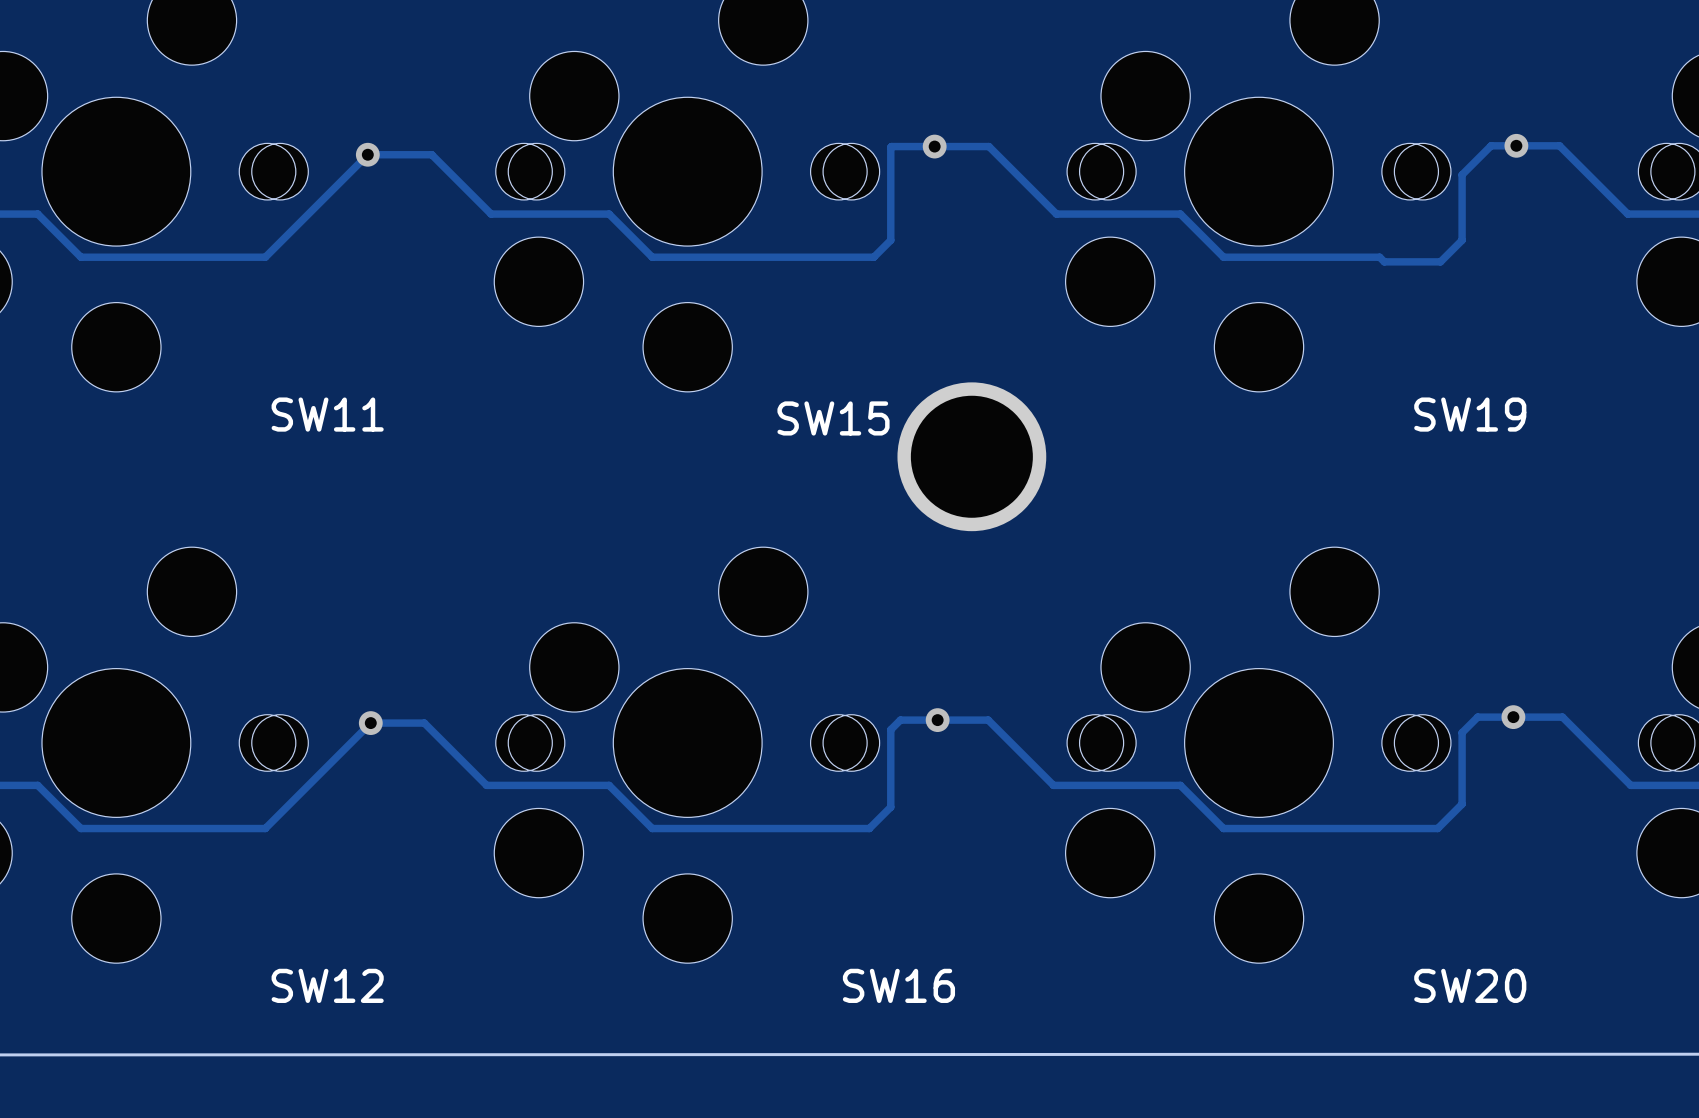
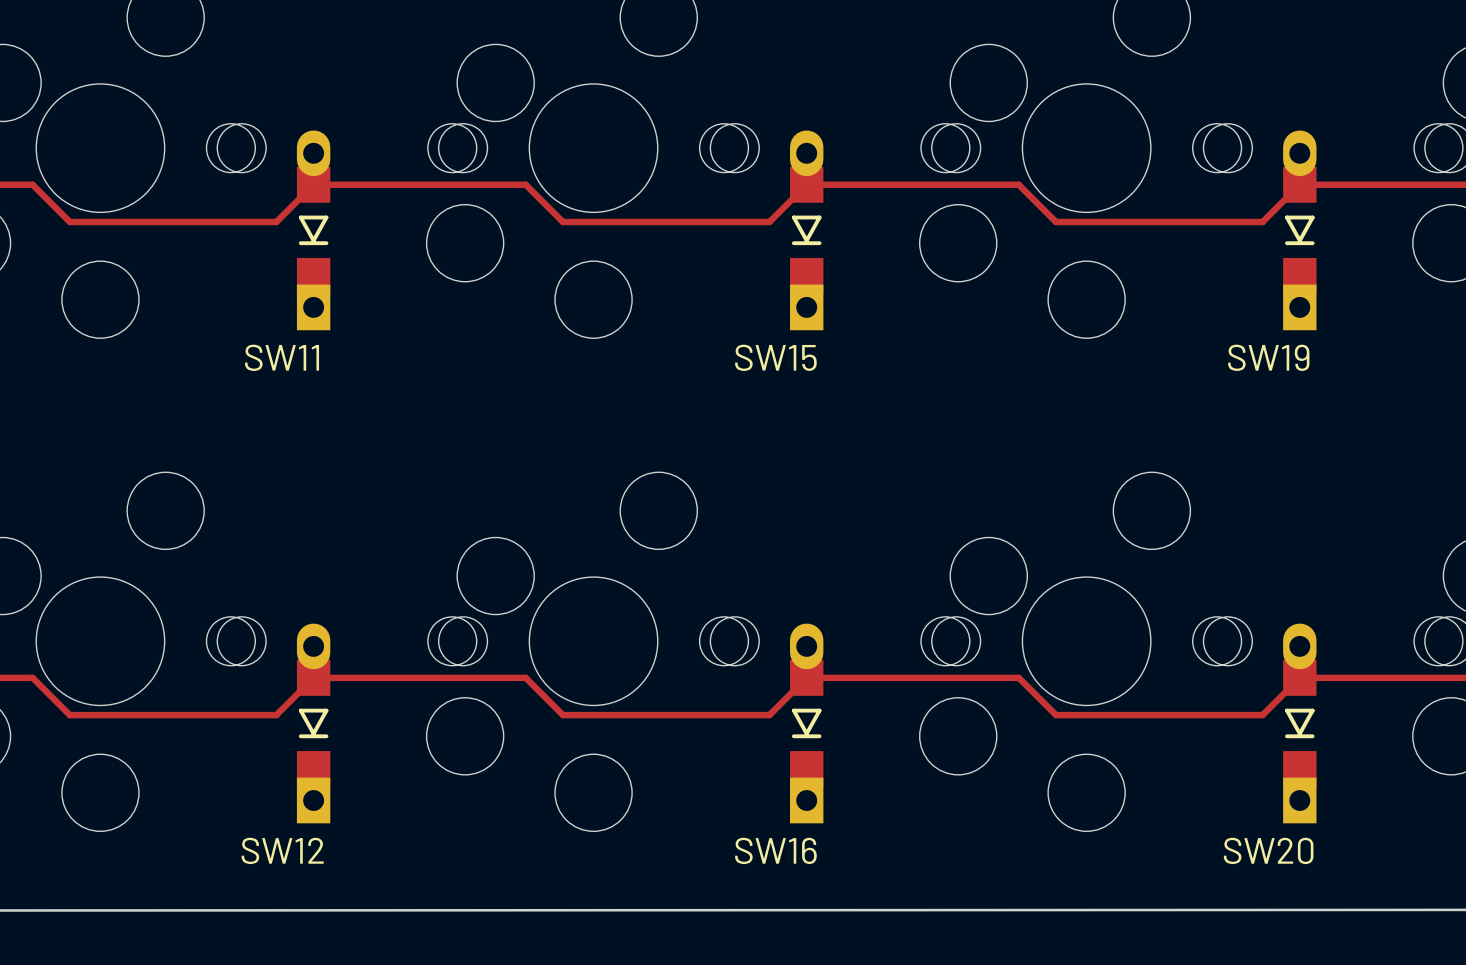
via: (1516, 145) -> none
via: (934, 146) -> none
via: (367, 154) -> none
track: (491, 214) (431, 154) (367, 154) (265, 257) -> (423, 184) (313, 184) (276, 222) (229, 222)
track: (1056, 214) (988, 146) (891, 146) (890, 240) (873, 257) -> (911, 184) (806, 184) (769, 222) (754, 222)
track: (1627, 214) (1559, 145) (1491, 145) (1462, 174) (1462, 240) (1440, 261) (1384, 261) (1379, 257) -> (1404, 184) (1299, 184) (1262, 222) (1190, 222)
part: none -> (313, 230)
part: none -> (806, 230)
part: none -> (1299, 230)
SW15 name position: SW15 (833, 418) -> SW15 (775, 357)
part: (971, 456) -> none
via: (1513, 717) -> none
via: (937, 720) -> none
via: (370, 723) -> none
track: (486, 785) (424, 723) (370, 723) (265, 828) -> (420, 677) (313, 677) (276, 715) (229, 715)
track: (1053, 785) (988, 720) (900, 720) (890, 729) (890, 807) (869, 828) -> (909, 677) (806, 677) (769, 715) (750, 715)
track: (1630, 785) (1562, 717) (1477, 717) (1462, 732) (1462, 804) (1437, 828) -> (1407, 677) (1299, 677) (1262, 715) (1240, 715)
part: none -> (313, 723)
part: none -> (806, 723)
part: none -> (1299, 723)

